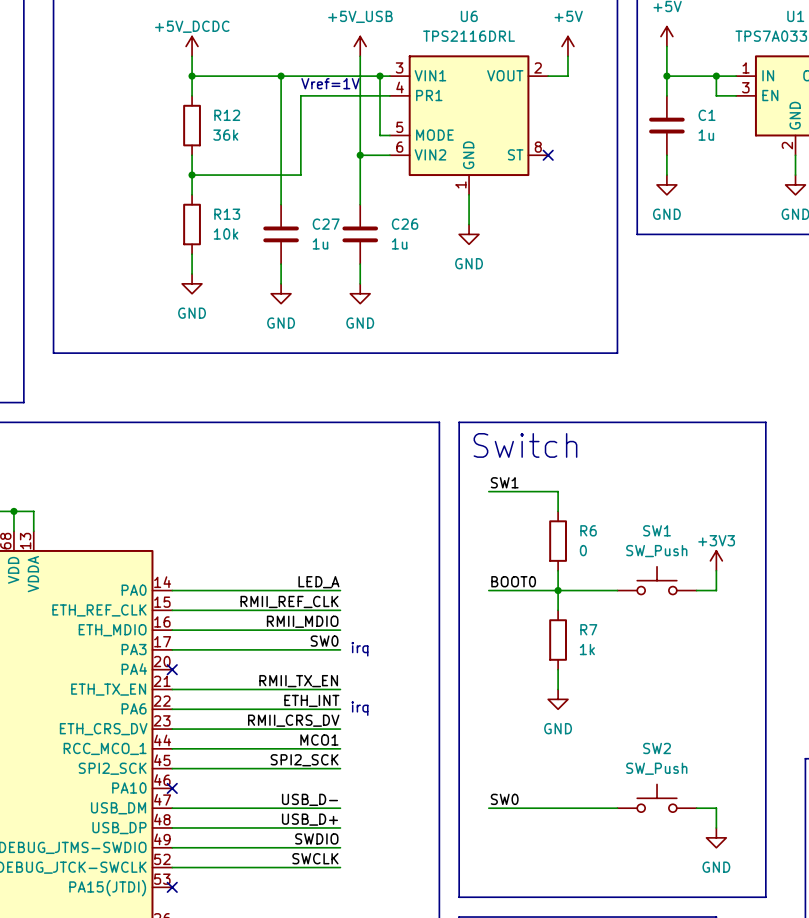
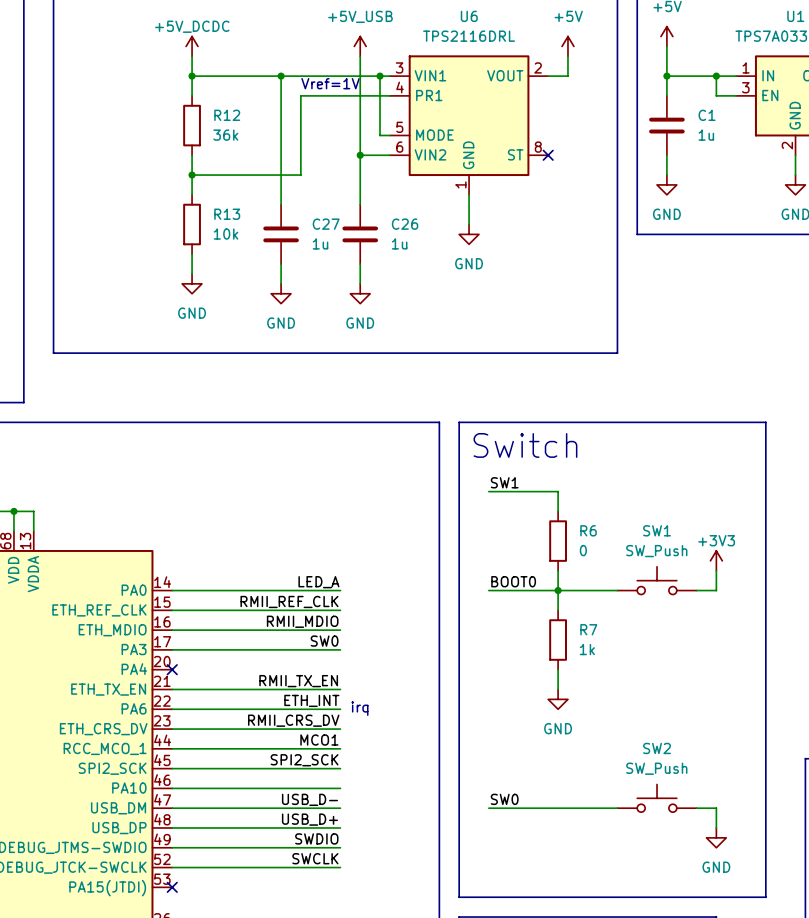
text: irq (359, 649) -> none
wire: none -> (172, 788) (340, 788)
no-connect mark: (172, 788) -> none

